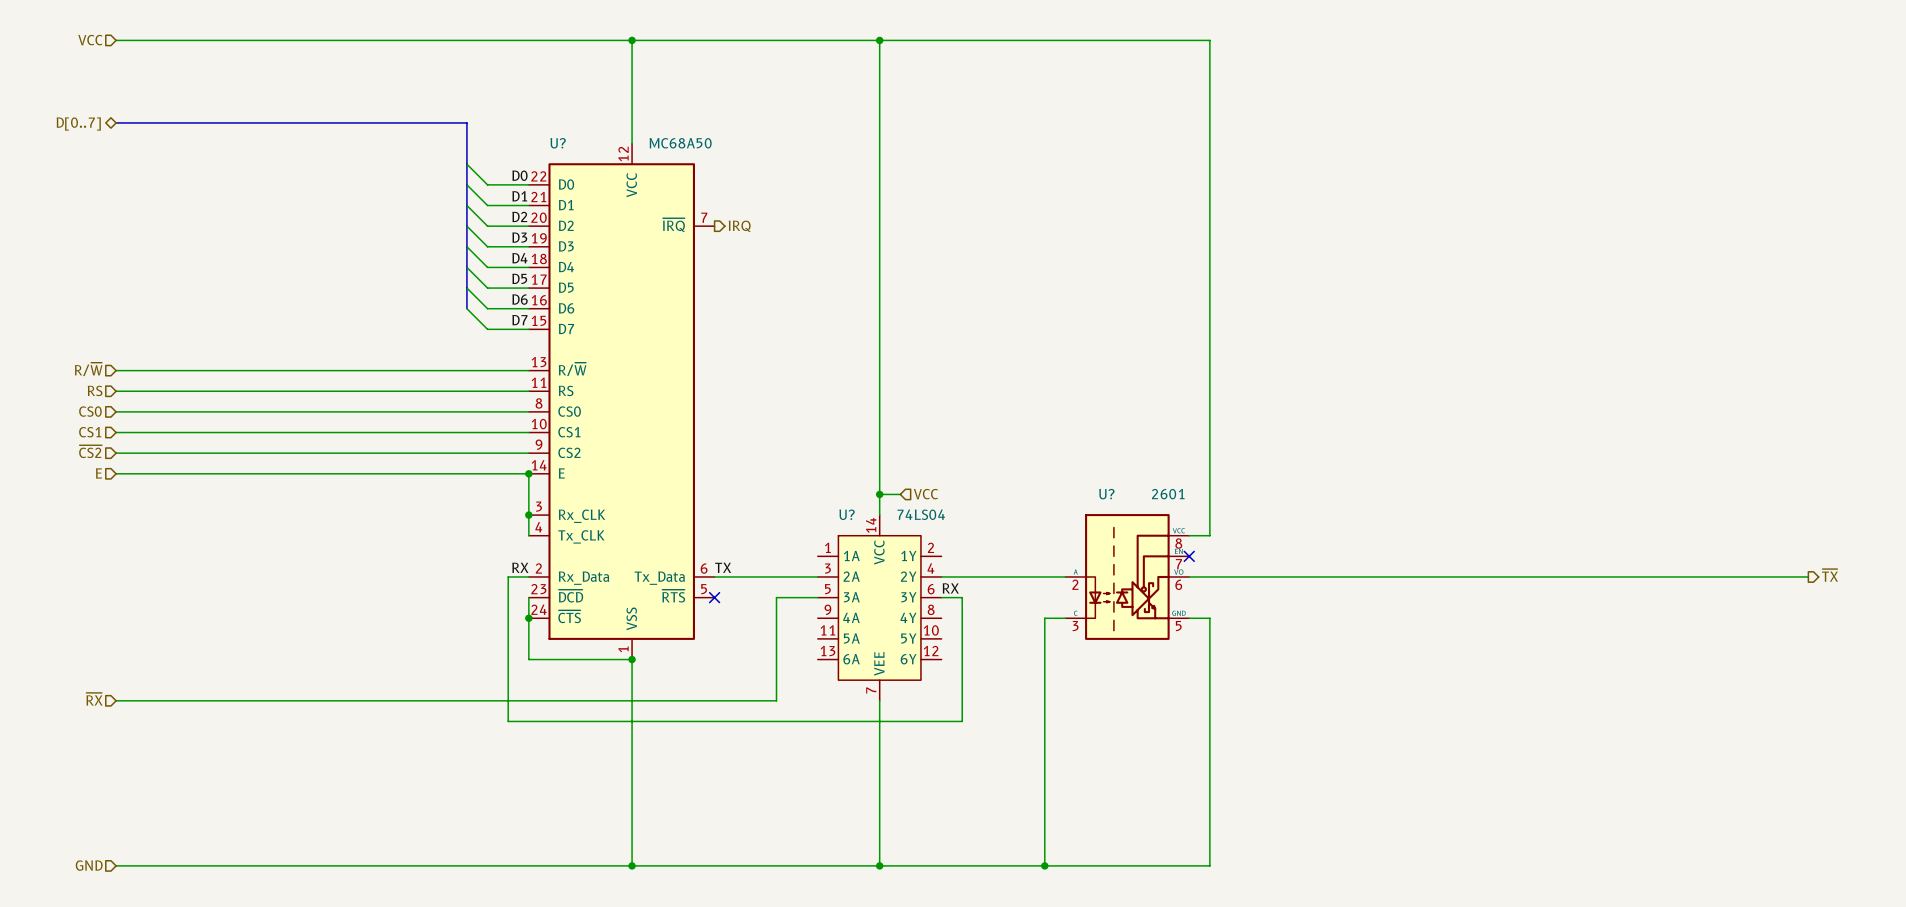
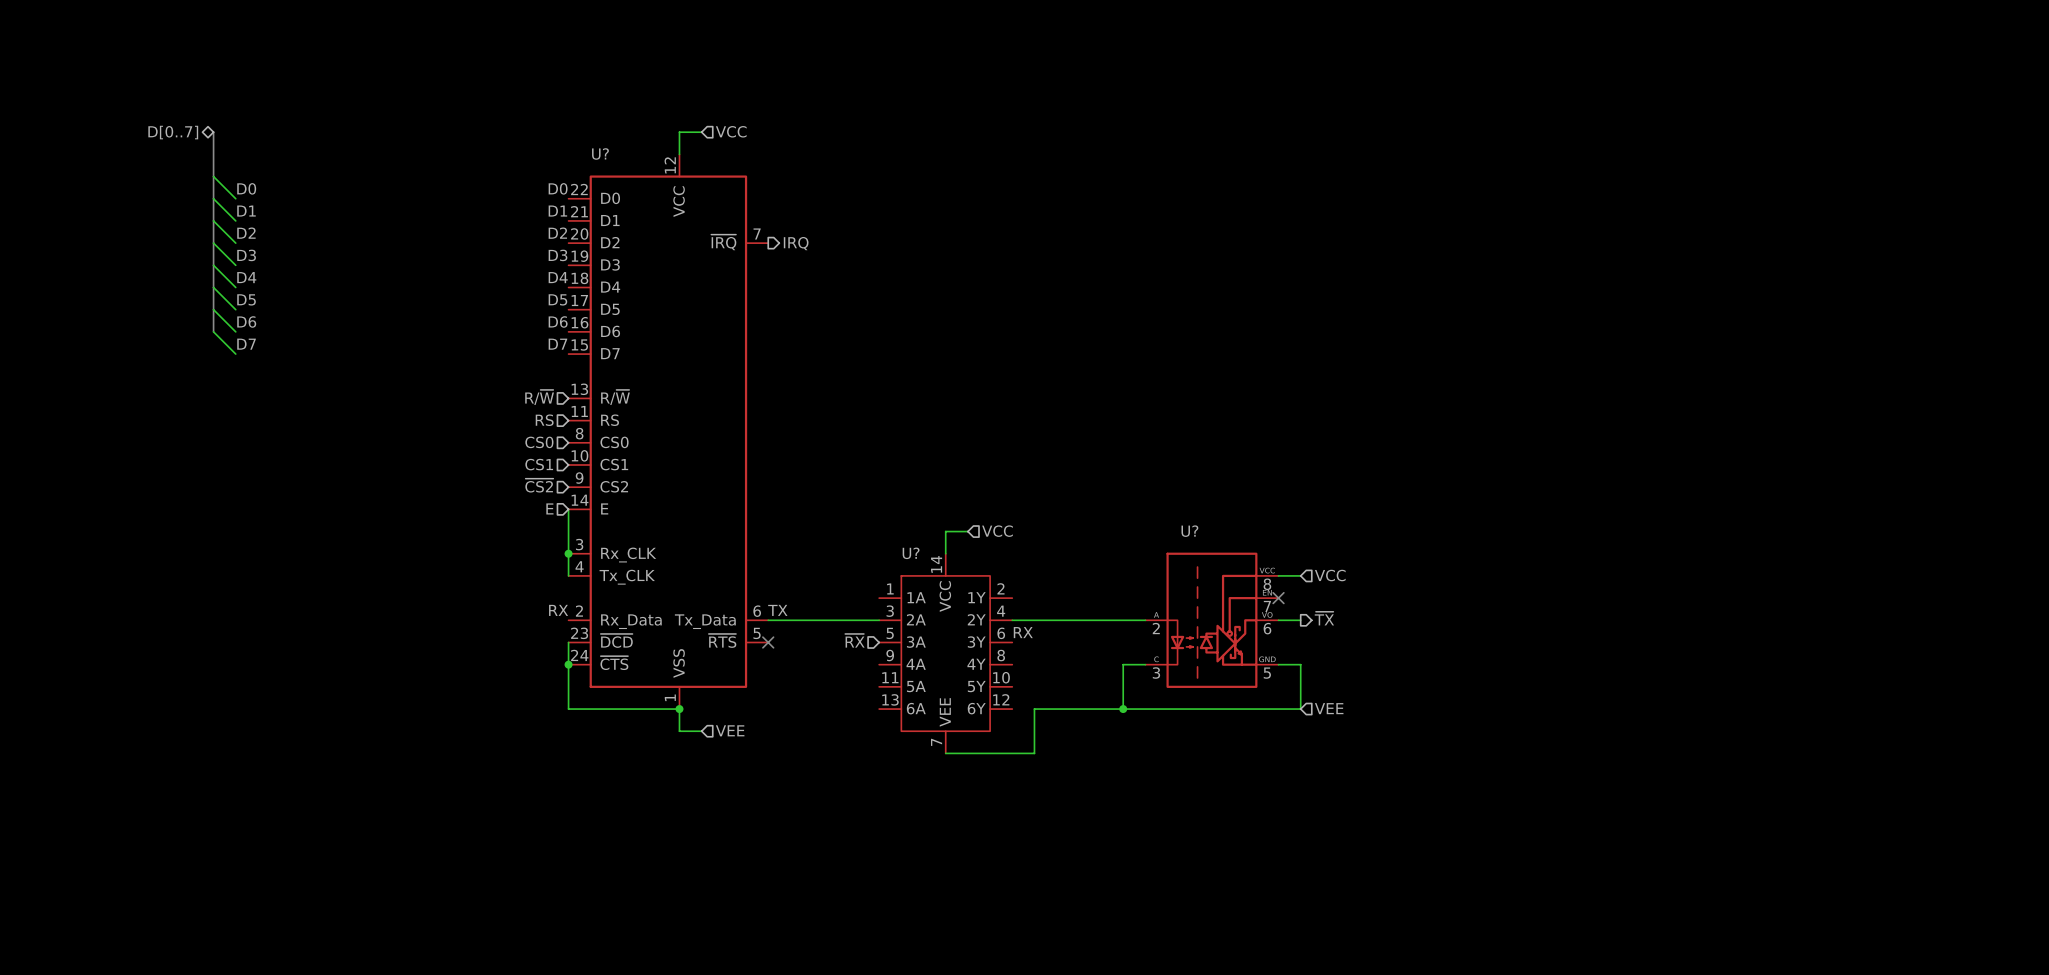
hierarchical label: VCC (90, 40) -> none
wire: (116, 40) (1209, 40) (1209, 535) -> none
wire: (632, 40) (632, 122) -> (701, 132) (679, 132)
junction: (632, 40) -> none
wire: (879, 40) (879, 494) -> none
junction: (879, 40) -> none
bus: (116, 122) (466, 122) (466, 308) -> none
bus: none -> (213, 132) (213, 331)
hierarchical label: none -> VCC (731, 131)
hierarchical label position: D[0..7] (78, 124) -> D[0..7] (173, 132)
U? value: MC68A50 (680, 143) -> none
wire: none -> (213, 176) (235, 198)
wire: (466, 164) (487, 184) (528, 184) -> none
label: none -> D0 (246, 188)
wire: none -> (213, 198) (235, 220)
wire: (466, 184) (487, 205) (528, 205) -> none
label: none -> D1 (246, 211)
wire: none -> (213, 220) (235, 243)
wire: (466, 205) (487, 226) (528, 226) -> none
label: none -> D2 (246, 233)
wire: none -> (213, 243) (235, 265)
wire: (466, 226) (487, 246) (528, 246) -> none
label: none -> D3 (246, 255)
wire: none -> (213, 265) (235, 287)
wire: (466, 246) (487, 267) (528, 267) -> none
label: none -> D4 (246, 277)
wire: none -> (213, 287) (235, 309)
wire: (466, 267) (487, 288) (528, 288) -> none
label: none -> D5 (246, 299)
wire: none -> (213, 309) (235, 331)
wire: (466, 288) (487, 308) (528, 308) -> none
label: none -> D6 (246, 321)
wire: none -> (213, 331) (235, 354)
wire: (466, 308) (487, 329) (528, 329) -> none
label: none -> D7 (246, 344)
hierarchical label: R/~{W} (88, 369) -> none
hierarchical label: none -> R/~{W} (539, 397)
wire: (116, 370) (528, 370) -> none
hierarchical label: RS (95, 390) -> none
hierarchical label: none -> RS (544, 420)
wire: (116, 391) (528, 391) -> none
hierarchical label: CS0 (90, 411) -> none
wire: (116, 411) (528, 411) -> none
hierarchical label: none -> CS0 (539, 442)
hierarchical label: CS1 (90, 432) -> none
wire: (116, 432) (528, 432) -> none
hierarchical label: none -> CS1 (539, 464)
hierarchical label: ~{CS2} (90, 451) -> none
hierarchical label: none -> ~{CS2} (539, 485)
wire: (116, 453) (528, 453) -> none
hierarchical label: E (98, 473) -> none
wire: (116, 473) (528, 473) -> none
hierarchical label: none -> E (549, 508)
junction: (528, 473) -> none
junction: (879, 494) -> none
U? value: 2601 (1168, 494) -> none
U? value: 74LS04 (921, 514) -> none
hierarchical label: none -> VCC (1330, 575)
hierarchical label: none -> ~{TX} (1324, 618)
hierarchical label: ~{TX} (1830, 575) -> none
wire: (528, 576) (508, 576) (508, 721) (962, 721) (962, 700) -> none
wire: (1209, 576) (1808, 576) -> none
hierarchical label: none -> ~{RX} (854, 640)
wire: (817, 597) (776, 597) (776, 700) (116, 700) -> none
wire: (941, 597) (962, 597) (962, 659) -> (1300, 709) (1034, 709)
wire: (1044, 659) (1044, 865) -> none
junction: none -> (1123, 709)
wire: (1209, 659) (1209, 865) (116, 865) -> none
hierarchical label: none -> VEE (1329, 708)
hierarchical label: none -> VEE (730, 730)
wire: (632, 680) (632, 865) -> (679, 731) (701, 731)
hierarchical label: ~{RX} (94, 699) -> none
wire: (879, 700) (879, 865) -> (945, 753) (1034, 753)
hierarchical label: GND (89, 865) -> none
junction: (632, 865) -> none
junction: (879, 865) -> none
junction: (1044, 865) -> none

